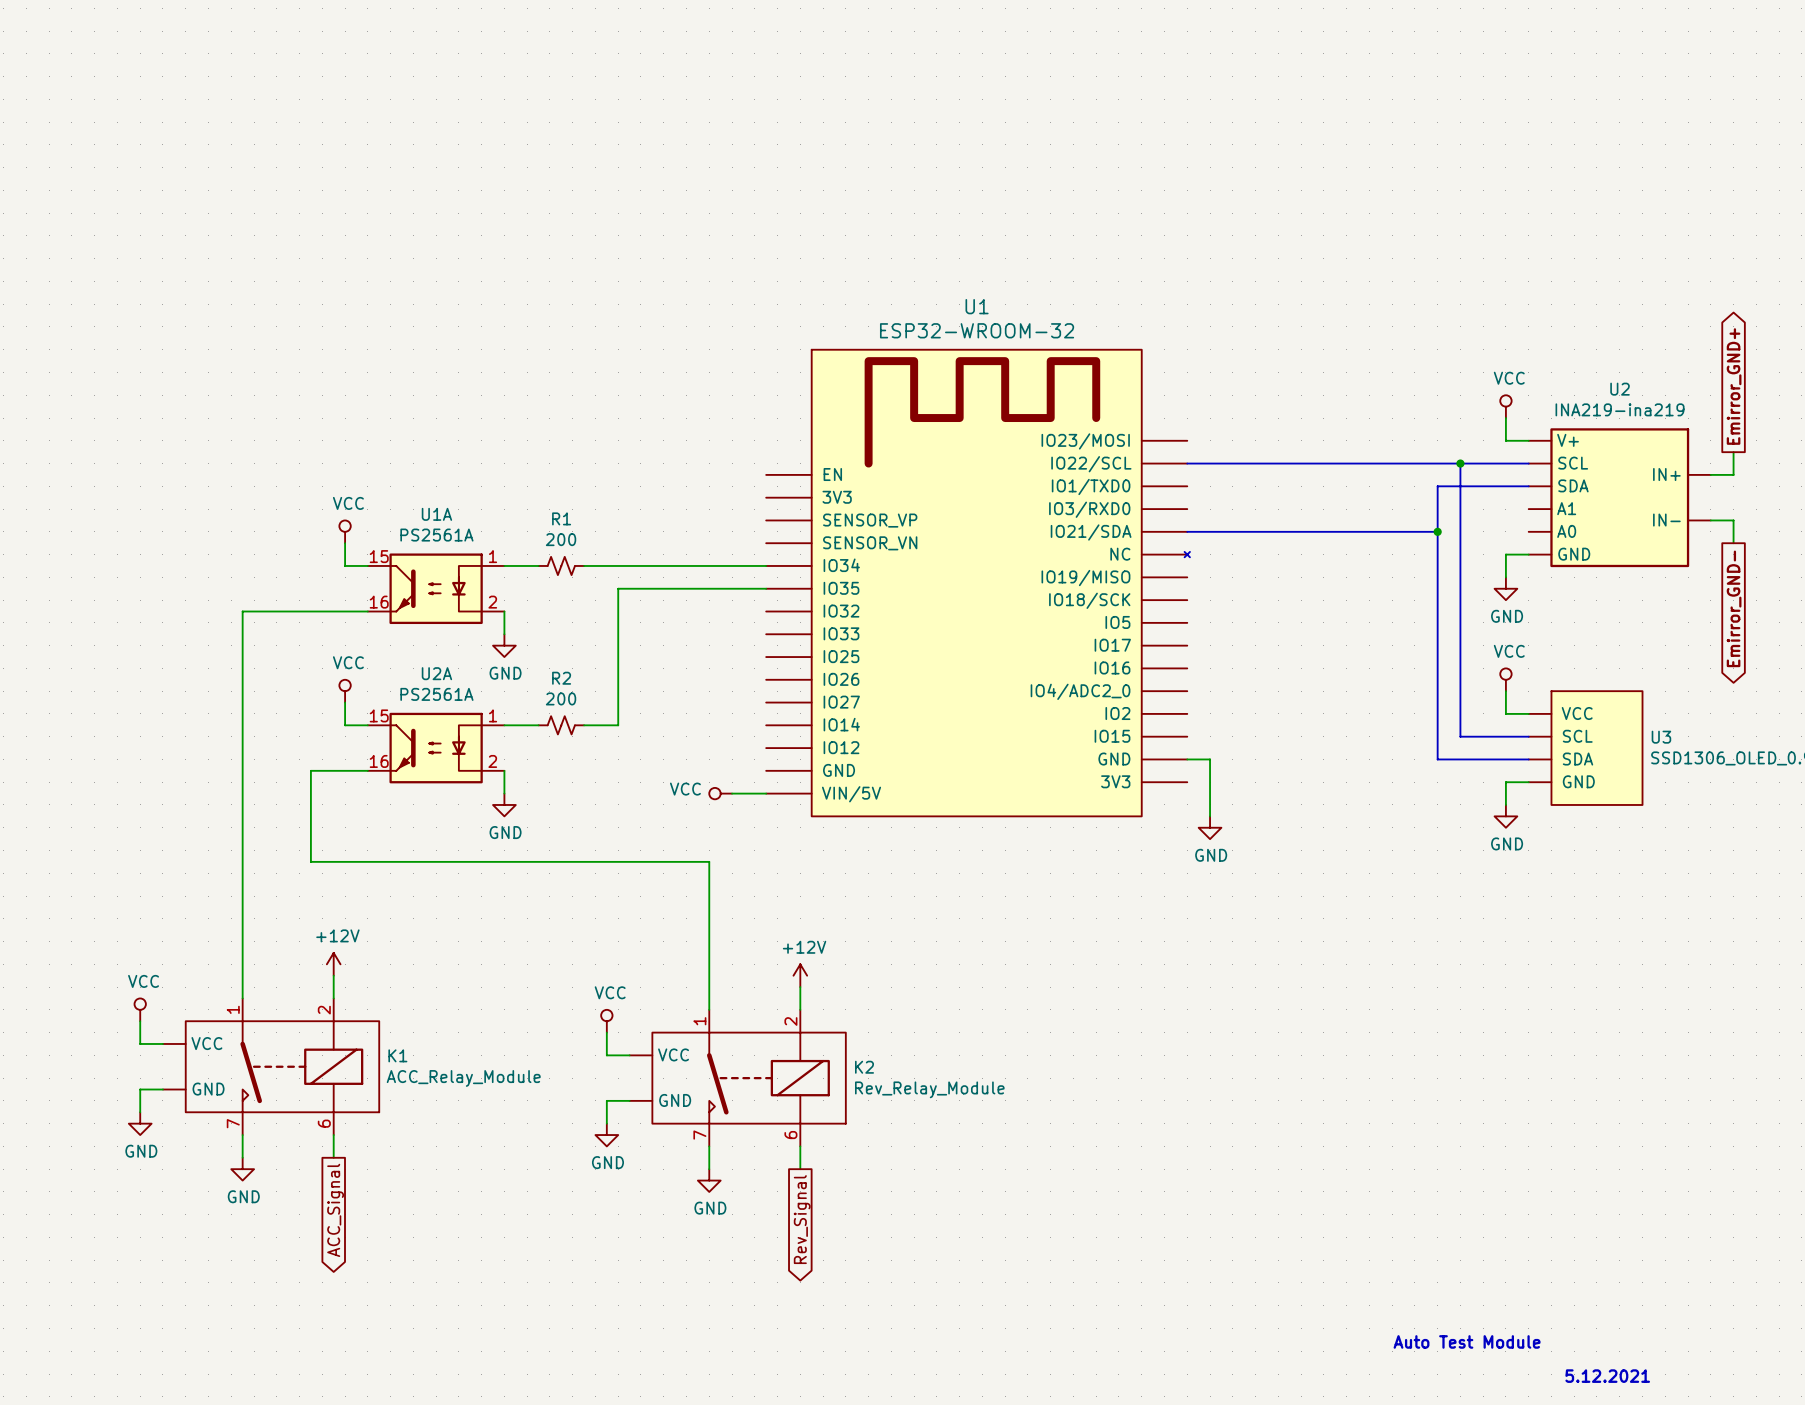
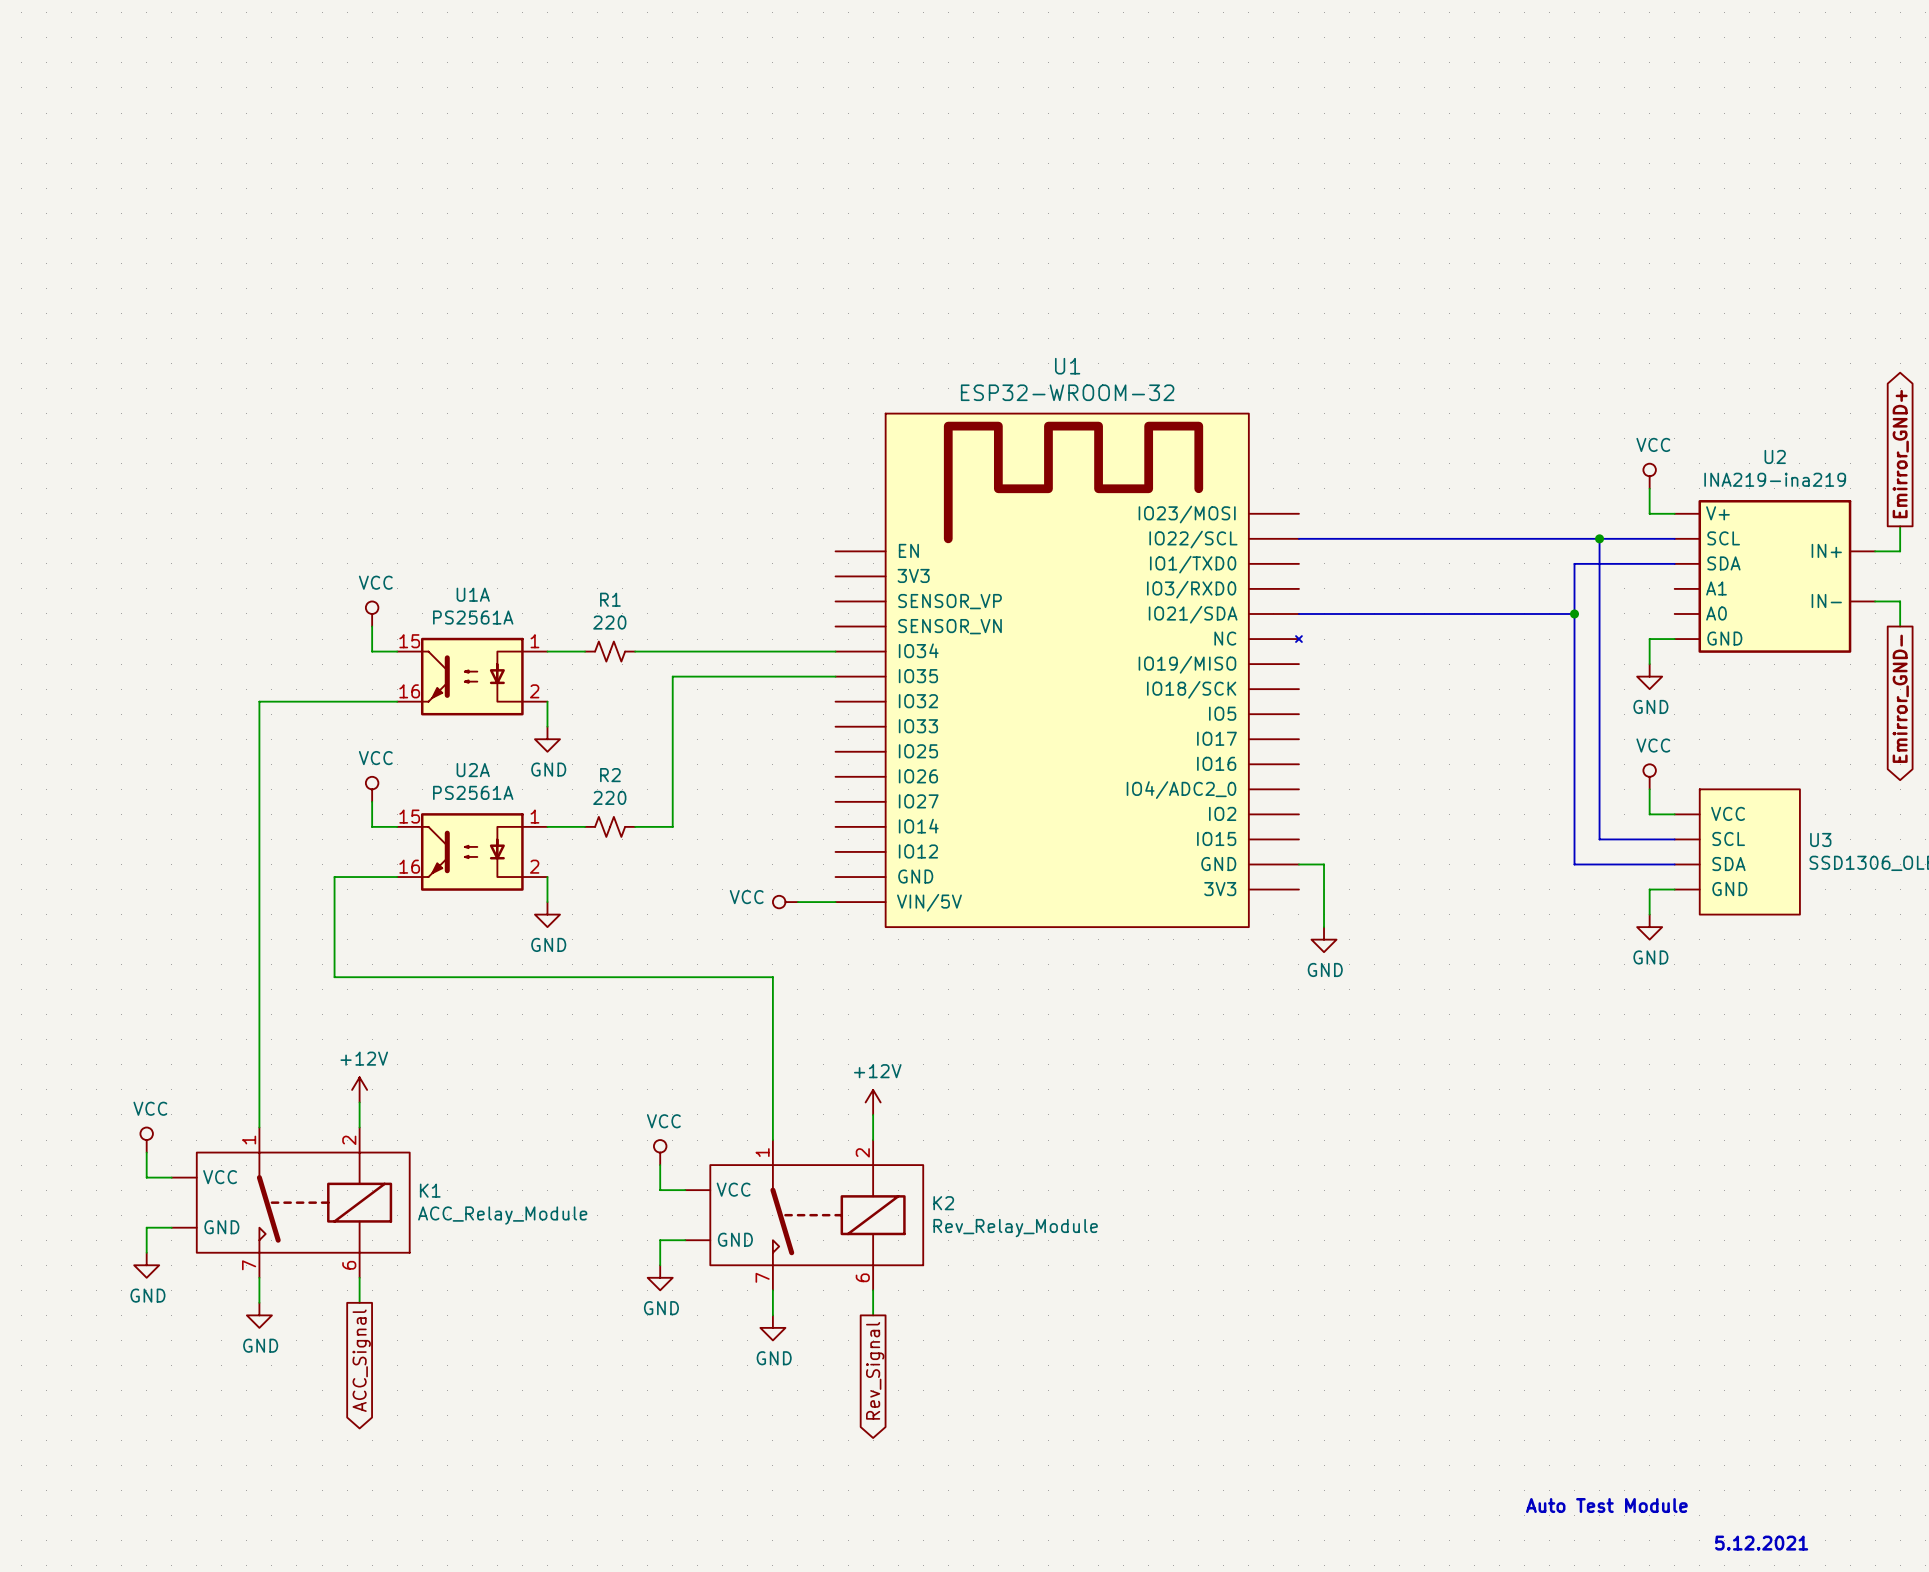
R1 value: 200 (561, 539) -> 220 (609, 622)
R2 value: 200 (561, 698) -> 220 (609, 797)

